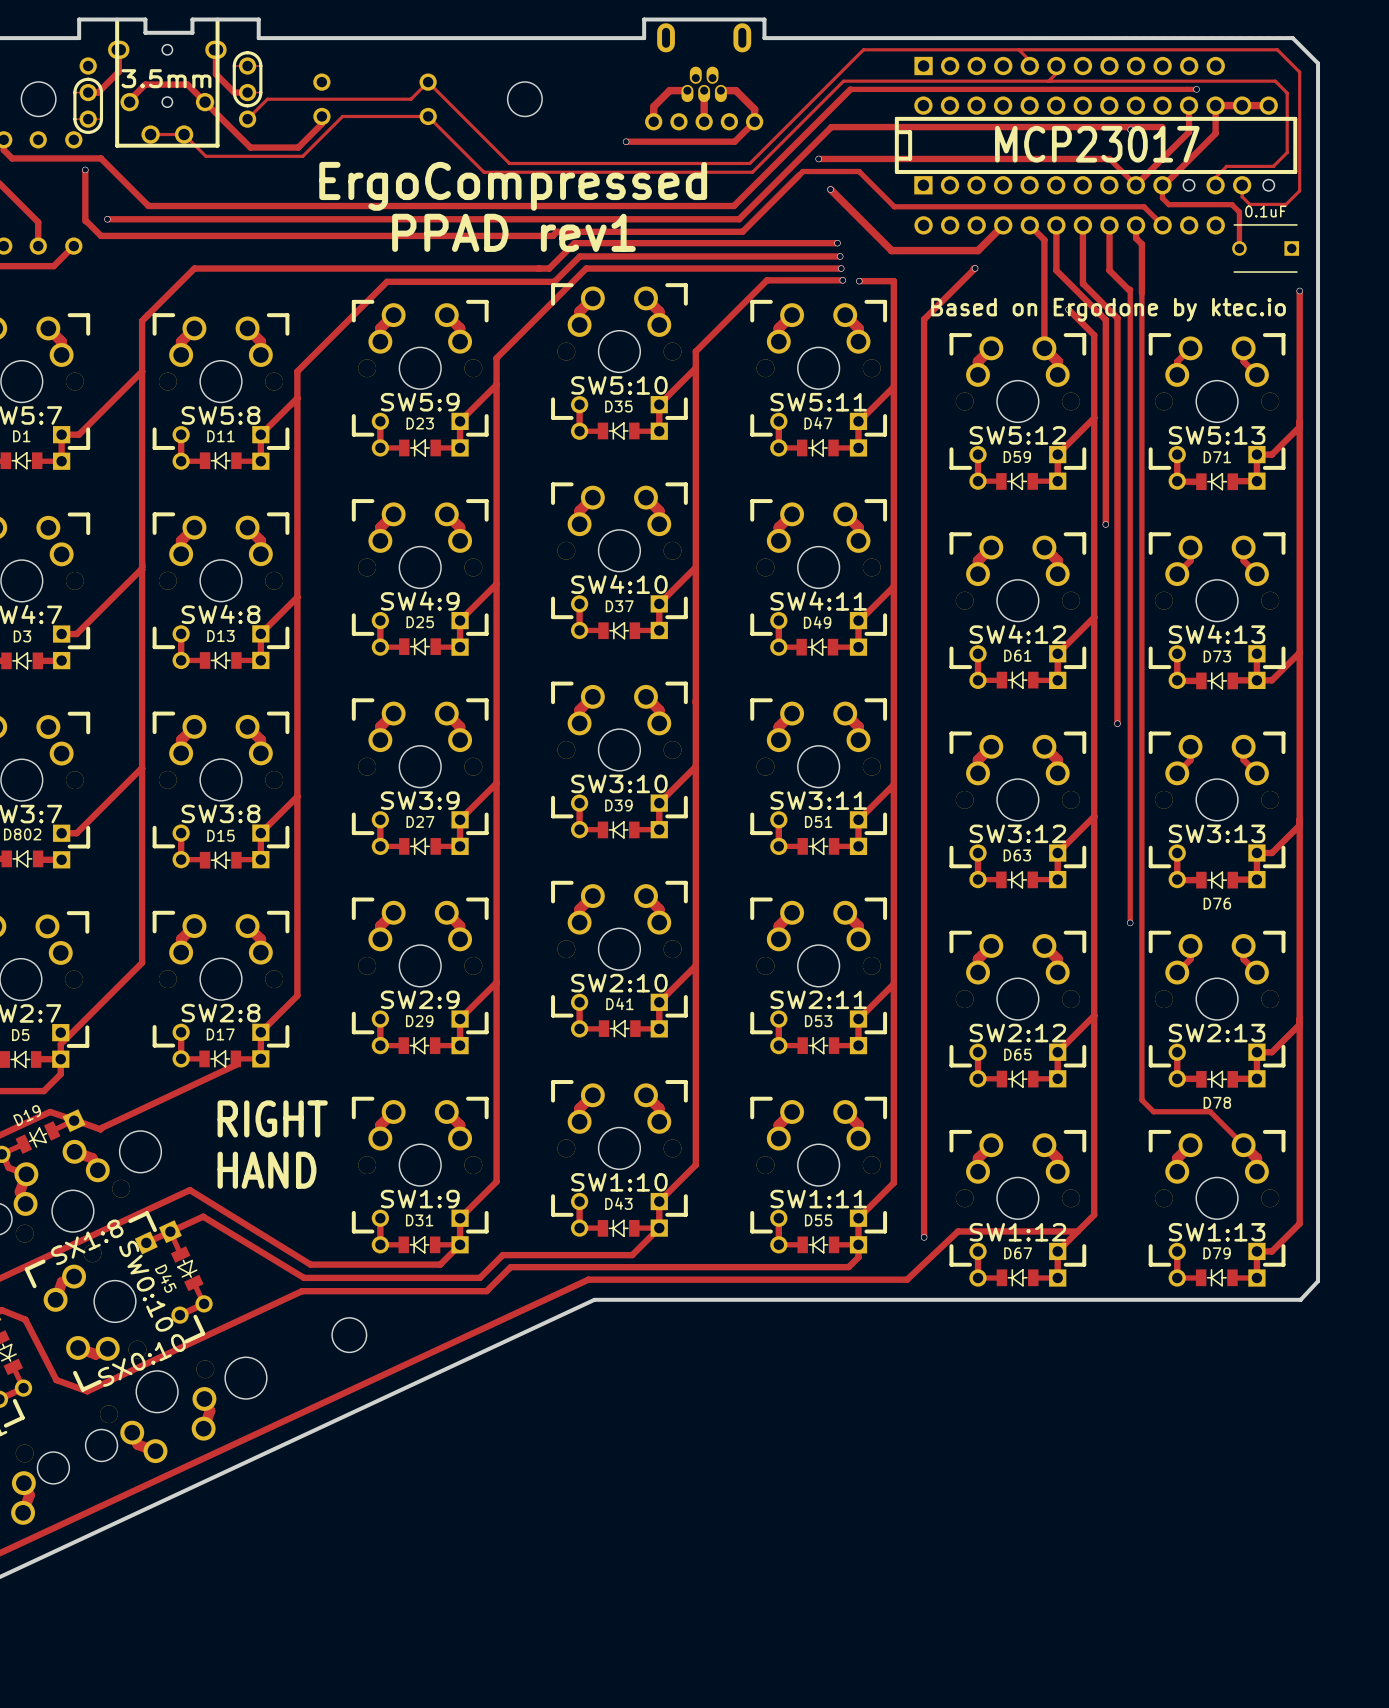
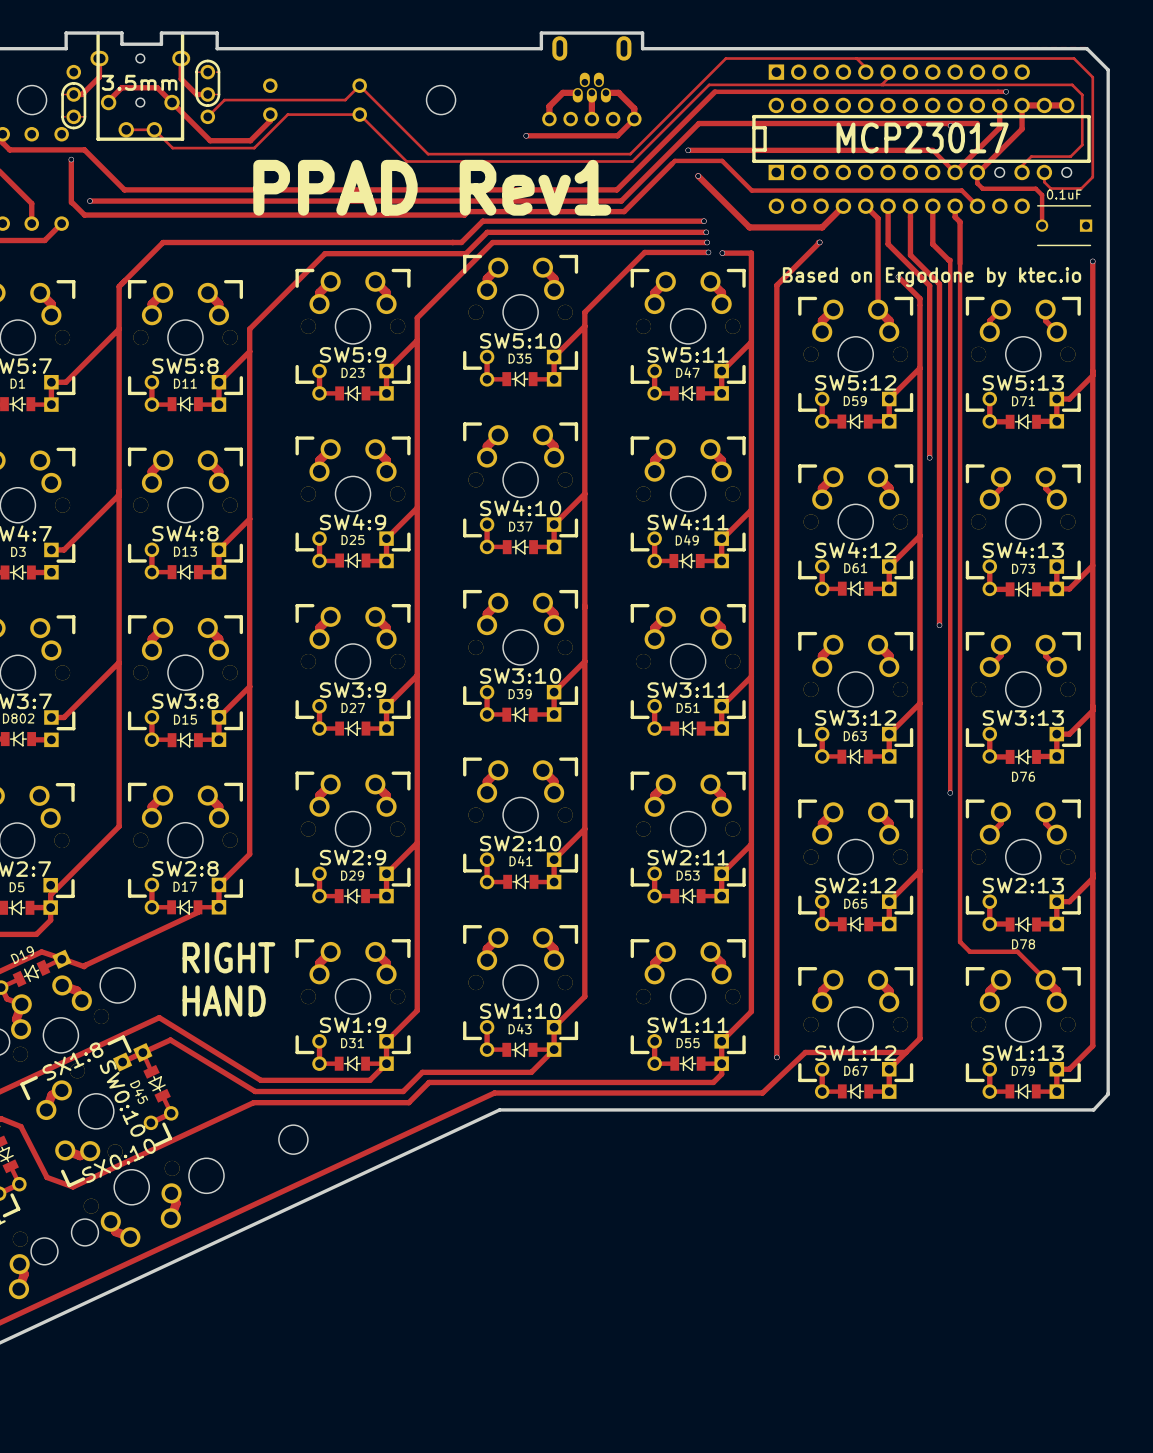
text: ErgoCompressed (513, 186) -> none
text: PPAD rev1 (513, 232) -> PPAD Rev1 (432, 187)

